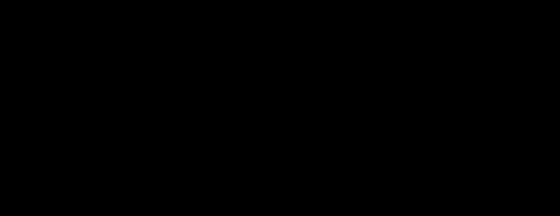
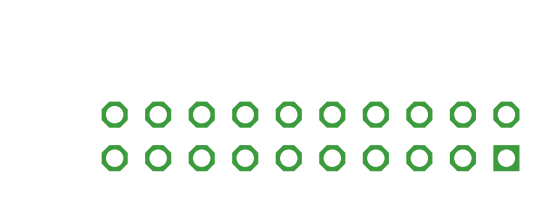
part: none -> (310, 136)

